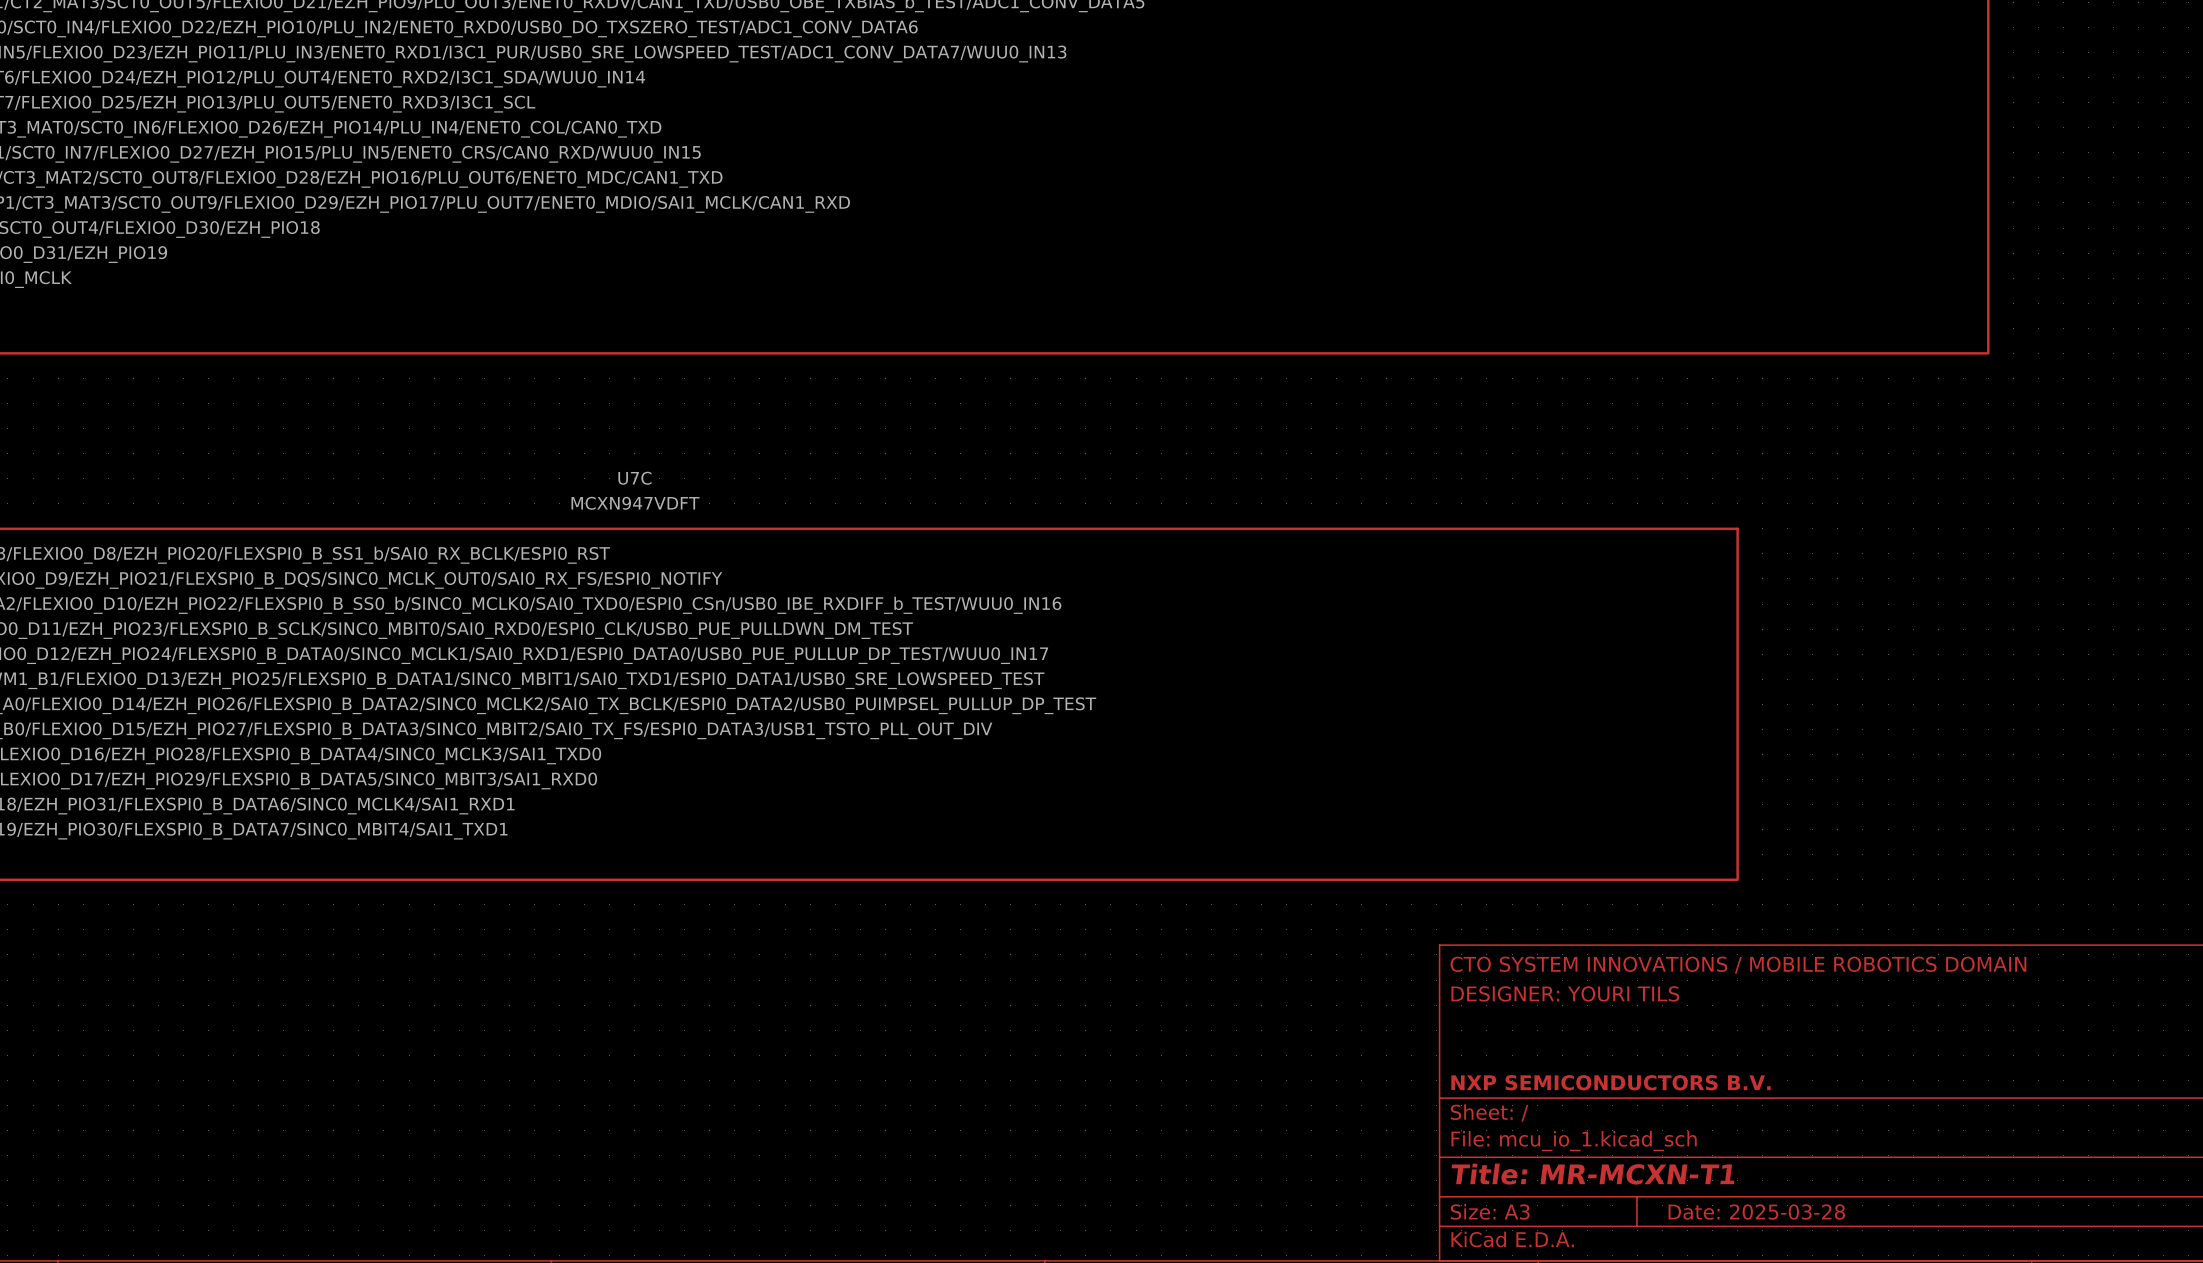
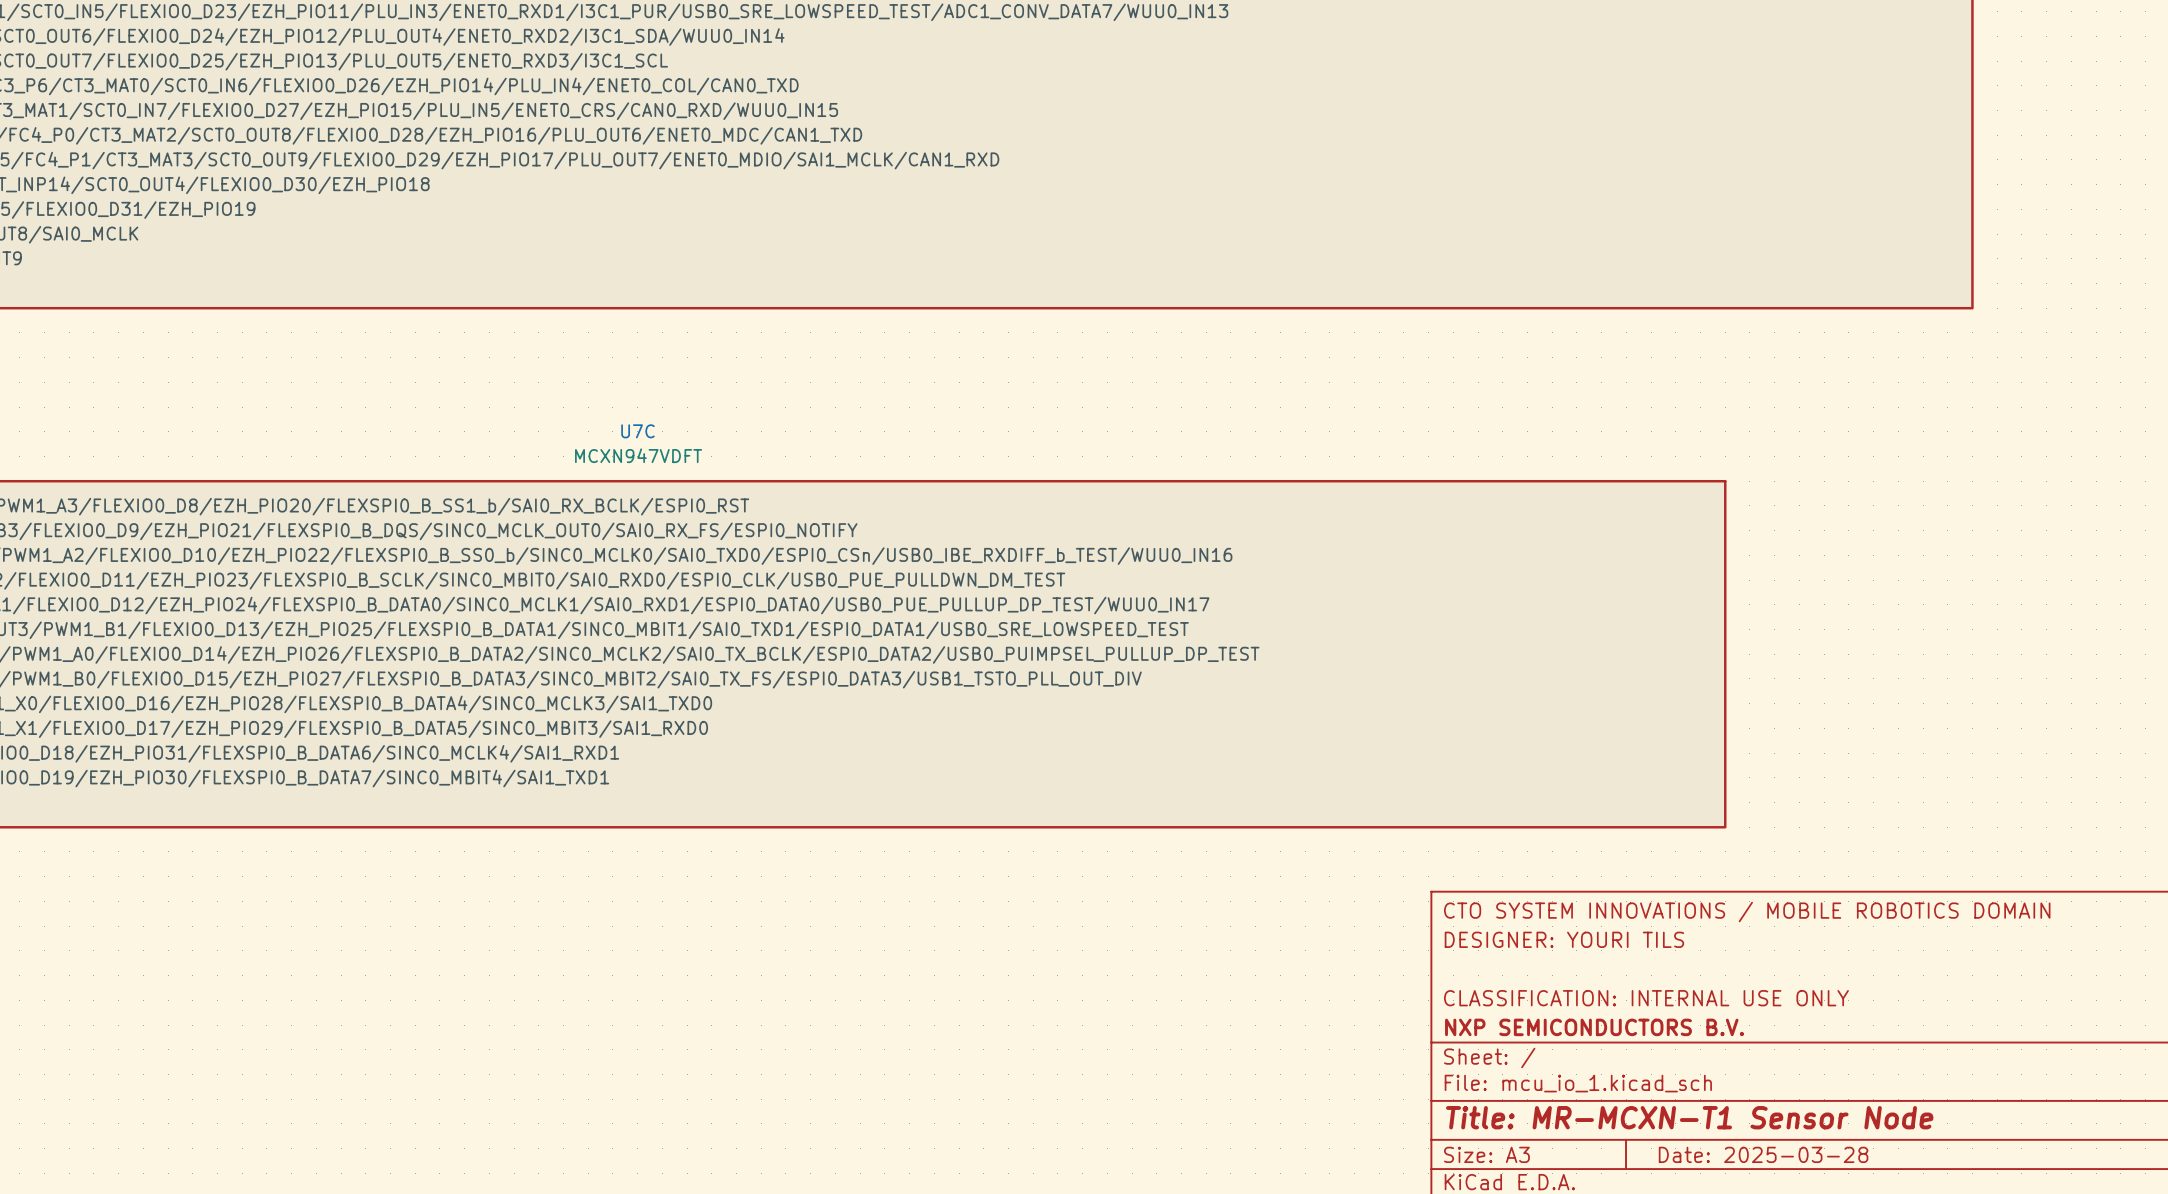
title block: none -> CLASSIFICATION: INTERNAL USE ONLY (1646, 998)
title block: Title: MR-MCXN-T1 (1593, 1174) -> Title: MR-MCXN-T1 Sensor Node (1689, 1117)

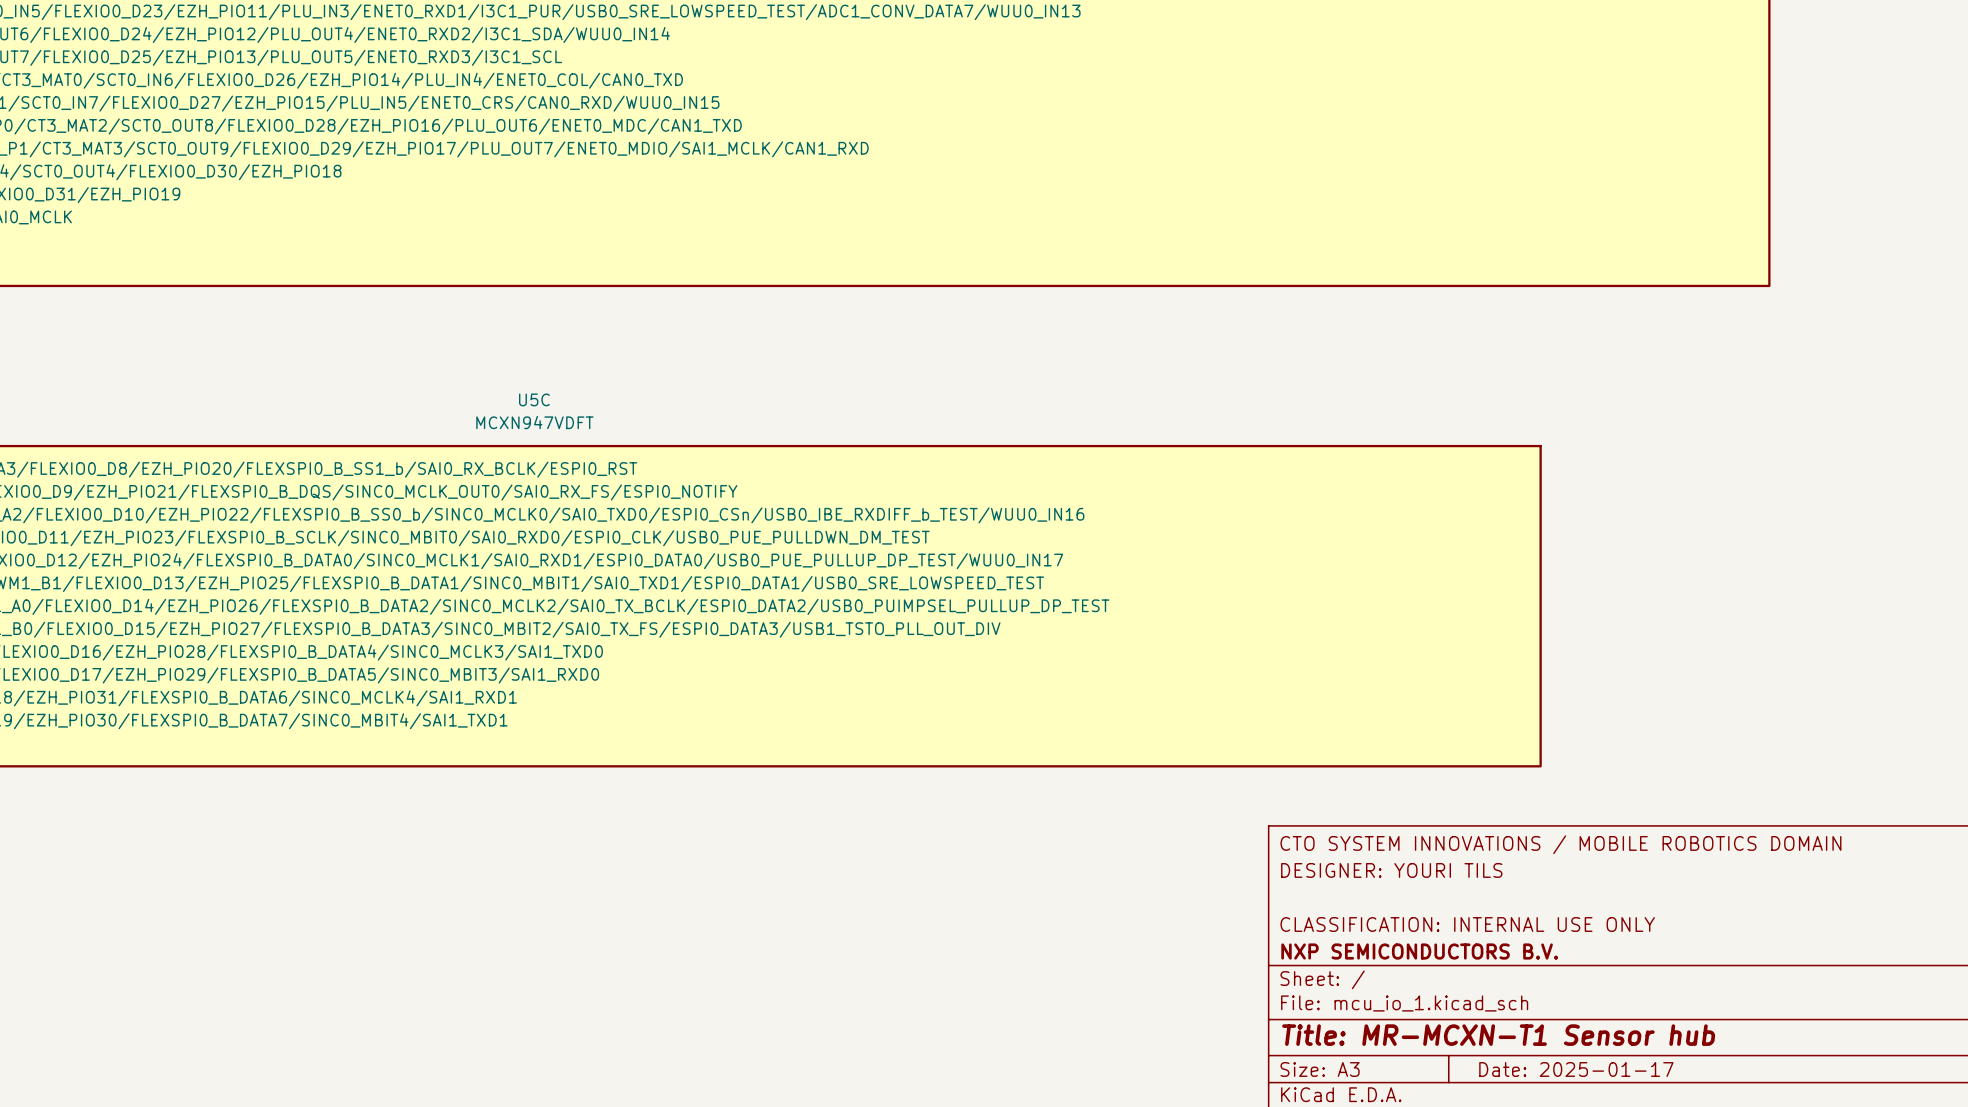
U7C name: U7C (637, 431) -> U5C (534, 399)
title block: Title: MR-MCXN-T1 Sensor Node (1689, 1117) -> Title: MR-MCXN-T1 Sensor hub (1498, 1035)
title block: Date: 2025-03-28 (1763, 1154) -> Date: 2025-01-17 (1576, 1069)

